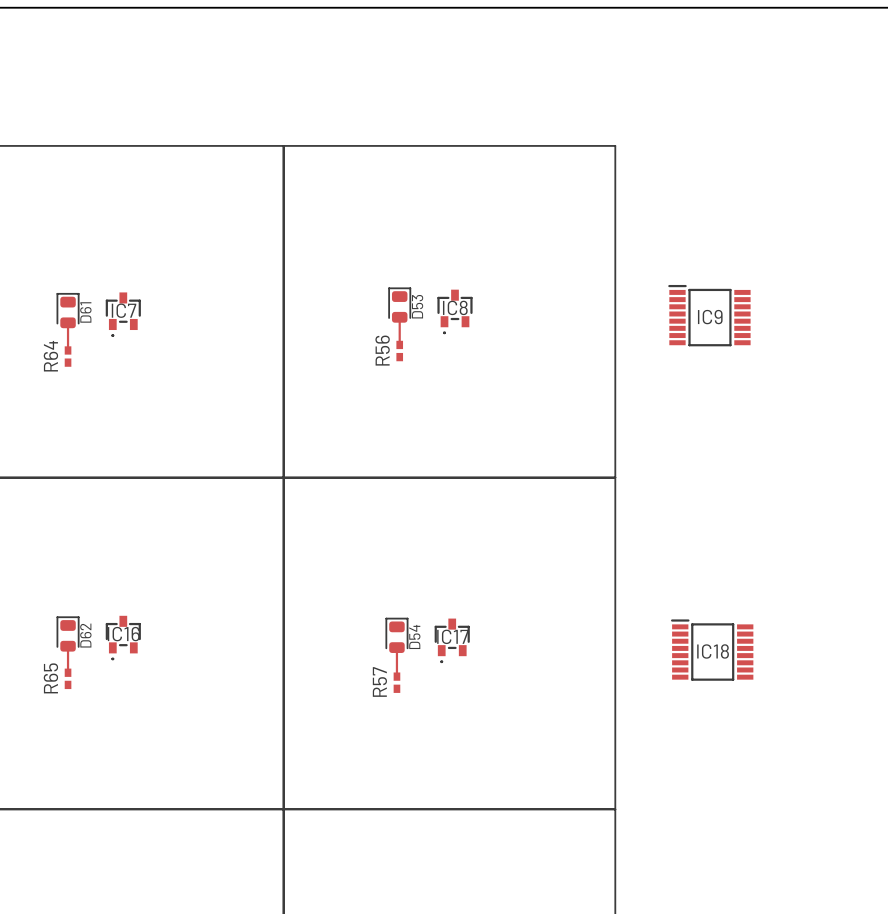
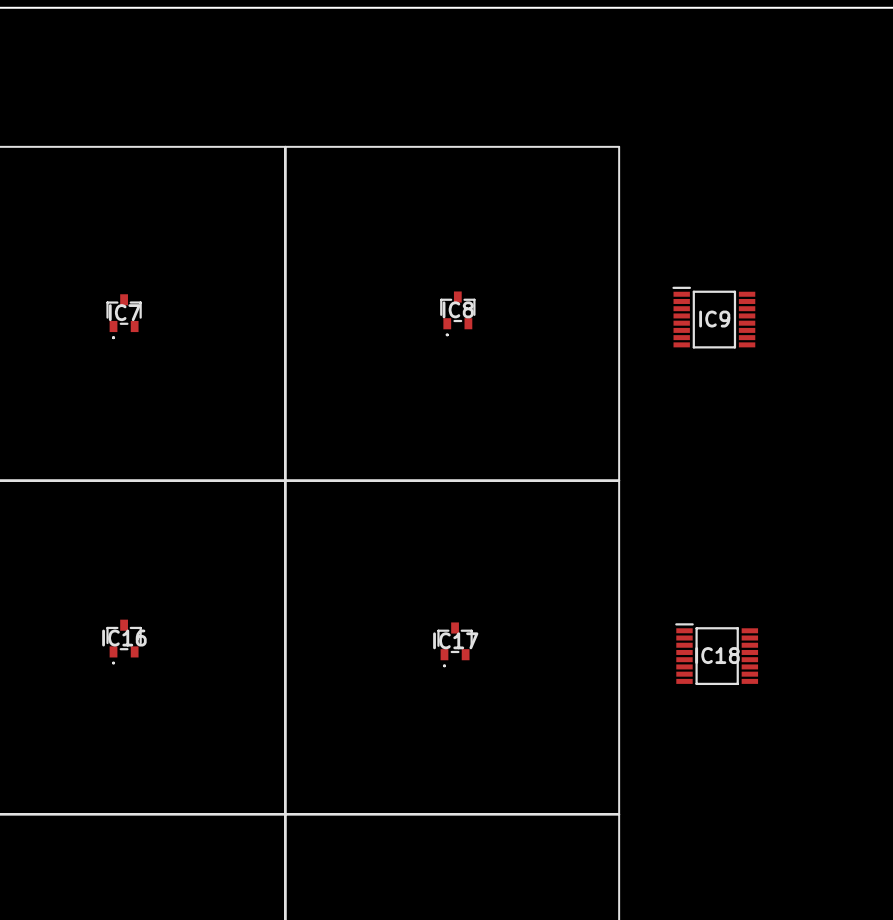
D53: (399, 305) -> none
D61: (68, 310) -> none
track: (399, 317) (399, 344) -> none
track: (68, 322) (68, 350) -> none
R56: (399, 351) -> none
R64: (68, 356) -> none
D62: (68, 634) -> none
D54: (396, 635) -> none
track: (68, 646) (68, 672) -> none
track: (396, 647) (396, 676) -> none
R65: (68, 678) -> none
R57: (396, 682) -> none

